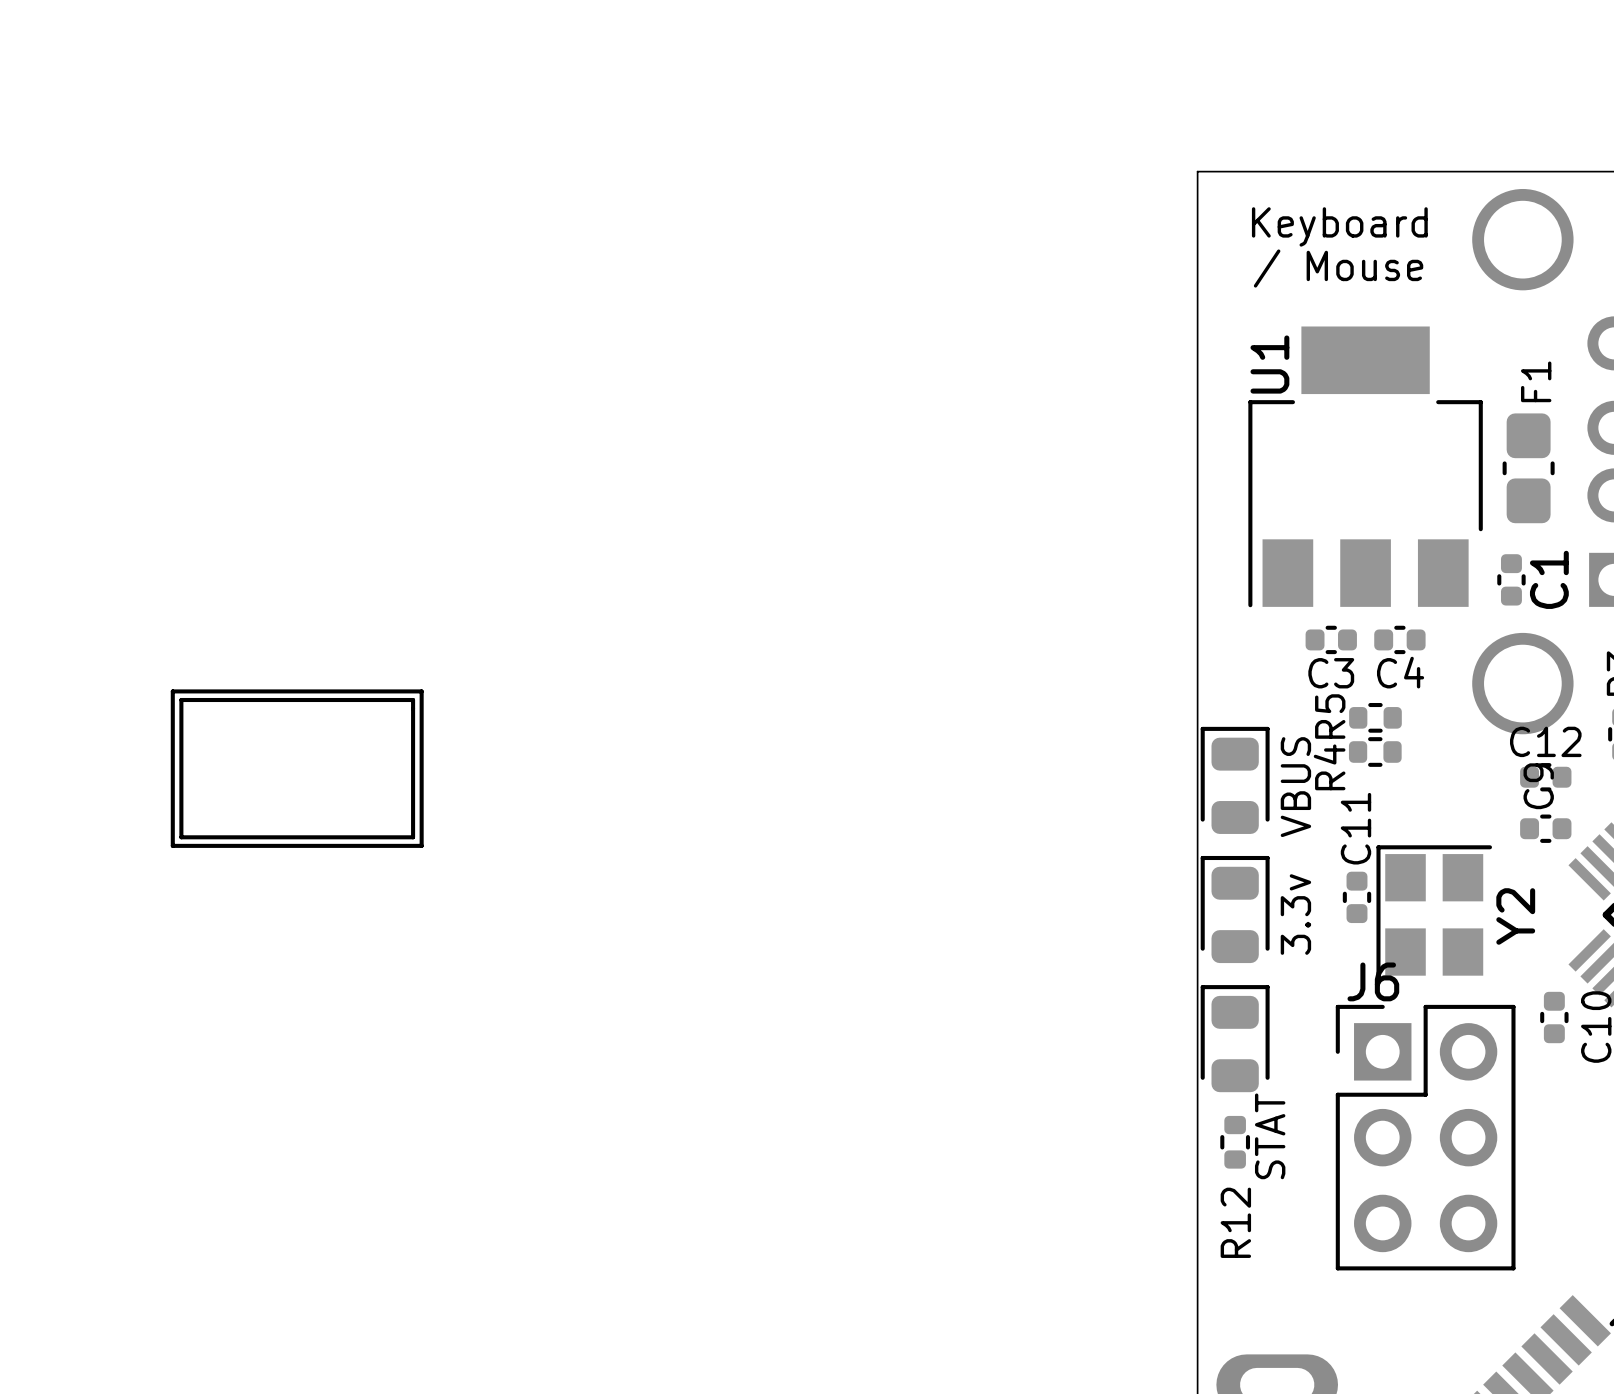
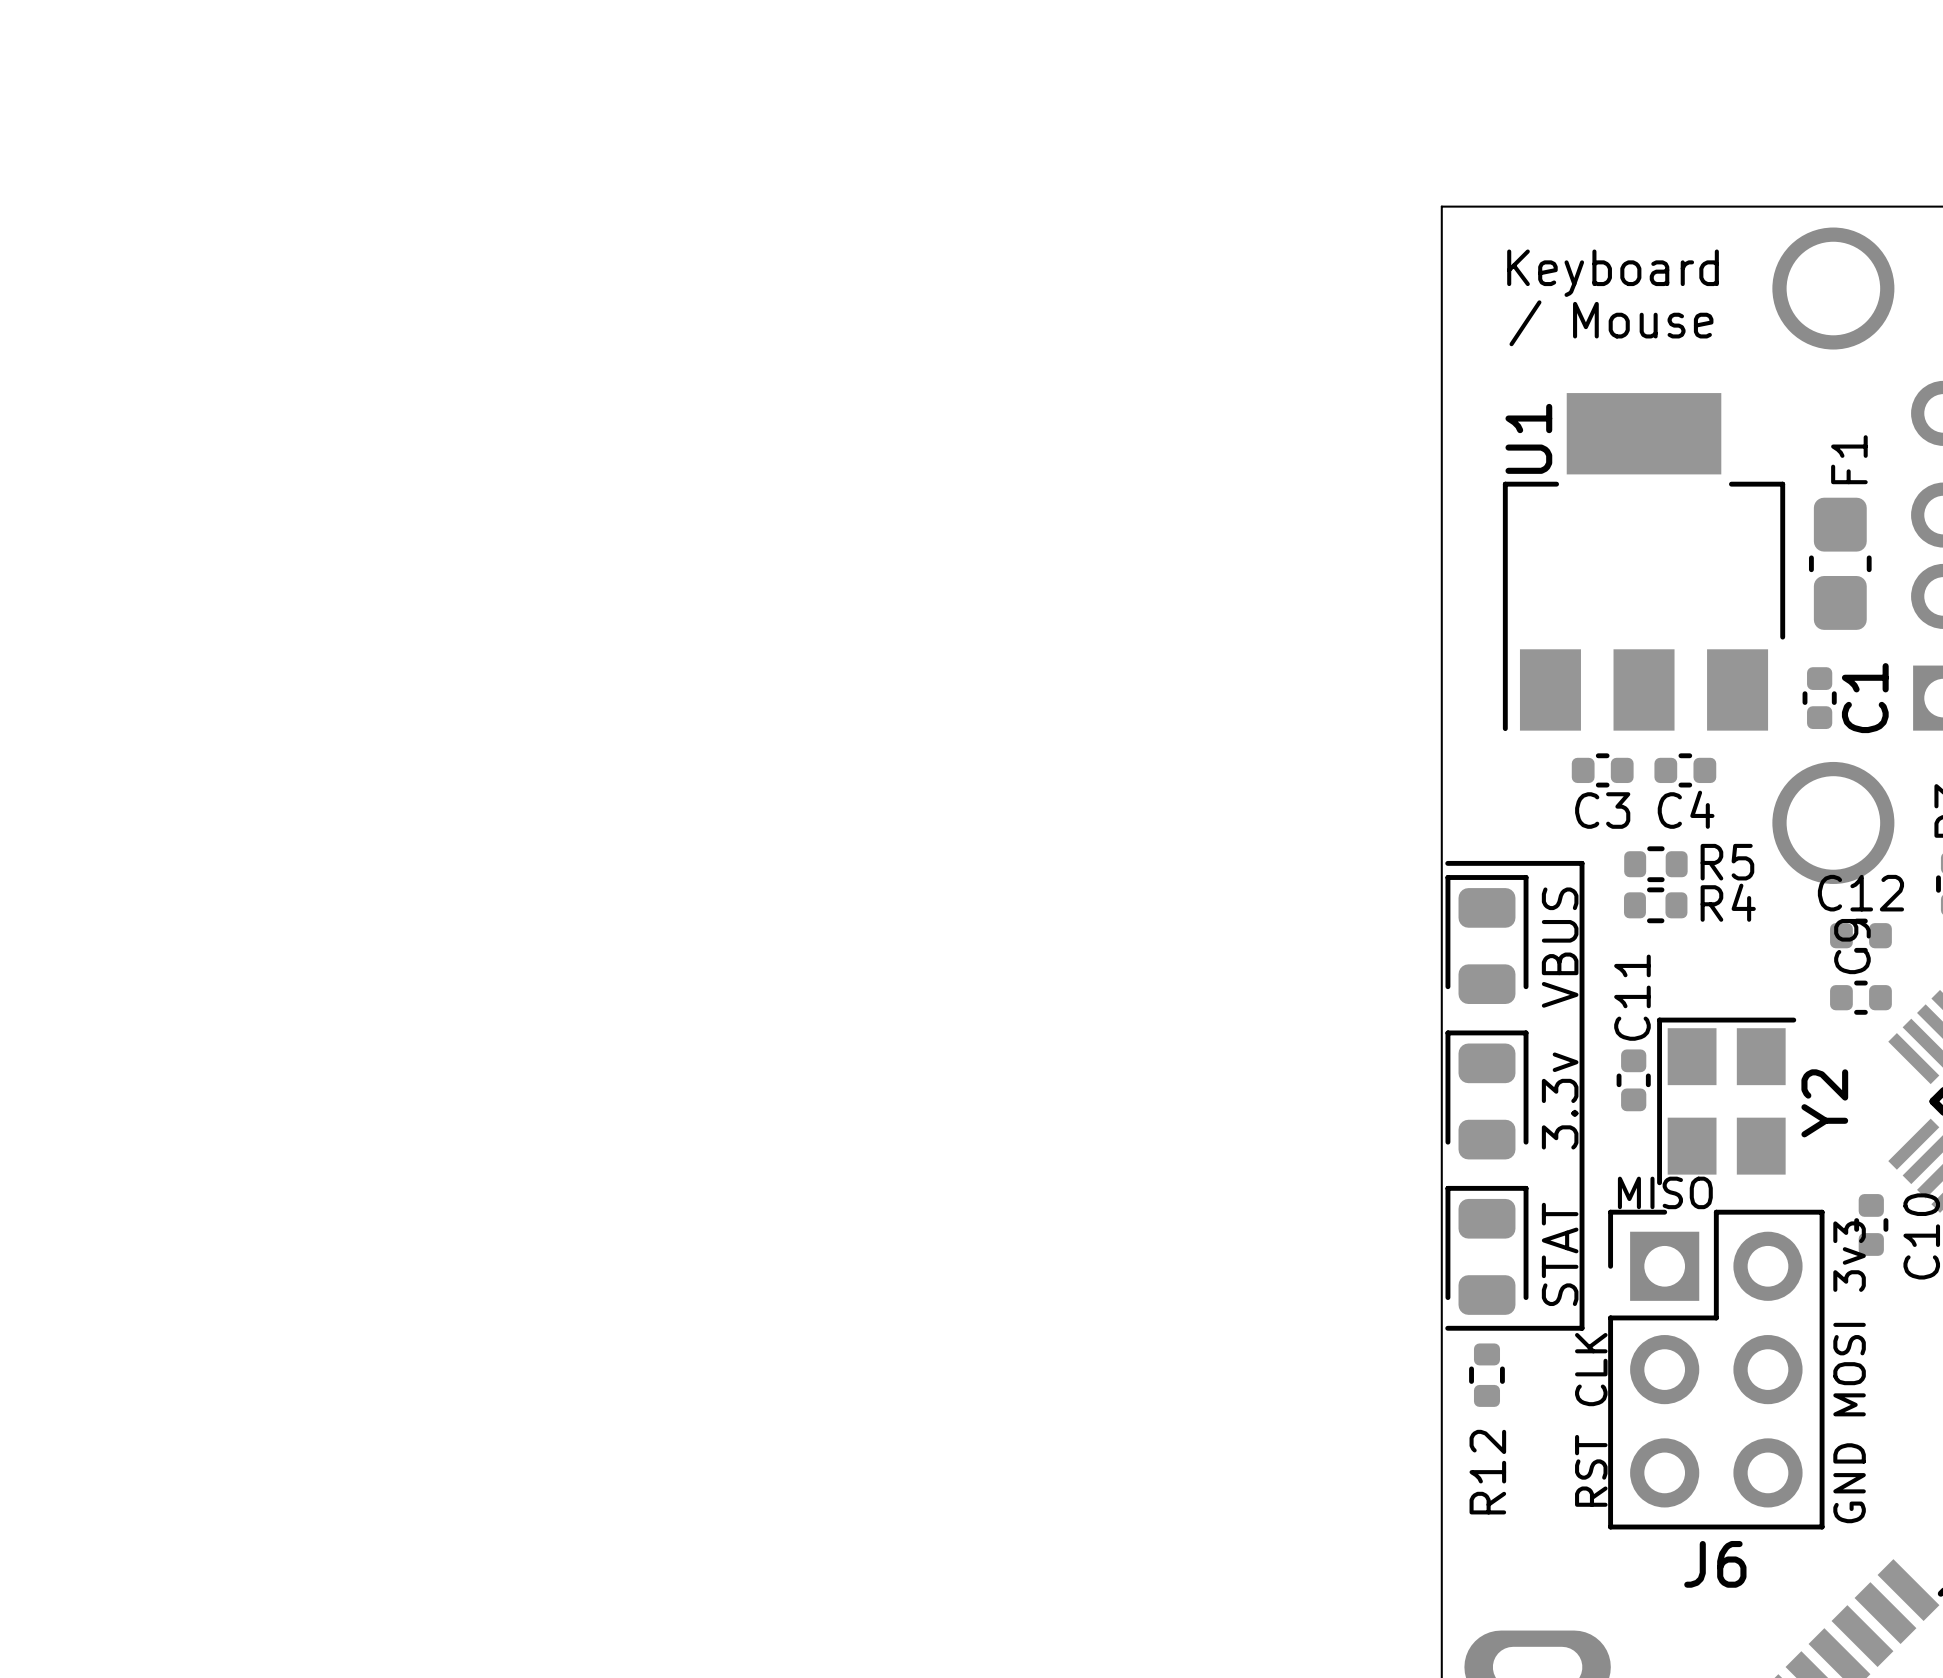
line: (172, 691) (421, 691) (421, 845) (172, 845) (172, 691) -> none
line: (181, 700) (413, 700) (413, 837) (181, 837) (181, 700) -> none
R5 name rotation: 0° (1330, 716) -> 90° clockwise (1727, 862)
R5 name position: R5 (1330, 716) -> R5 (1727, 862)
line: none -> (1447, 863) (1582, 863) (1582, 1328) (1447, 1328)
R4 name rotation: 0° (1329, 767) -> 90° clockwise (1728, 902)
R4 name position: R4 (1329, 767) -> R4 (1728, 902)
J6 name position: J6 (1373, 981) -> J6 (1715, 1564)
text: none -> MISO (1665, 1192)
text: none -> 3v3 (1849, 1256)
text position: STAT (1270, 1136) -> STAT (1560, 1254)
text: none -> CLK (1591, 1369)
text: none -> MOSI (1849, 1369)
text: none -> RST (1591, 1470)
text: none -> GND (1849, 1483)

